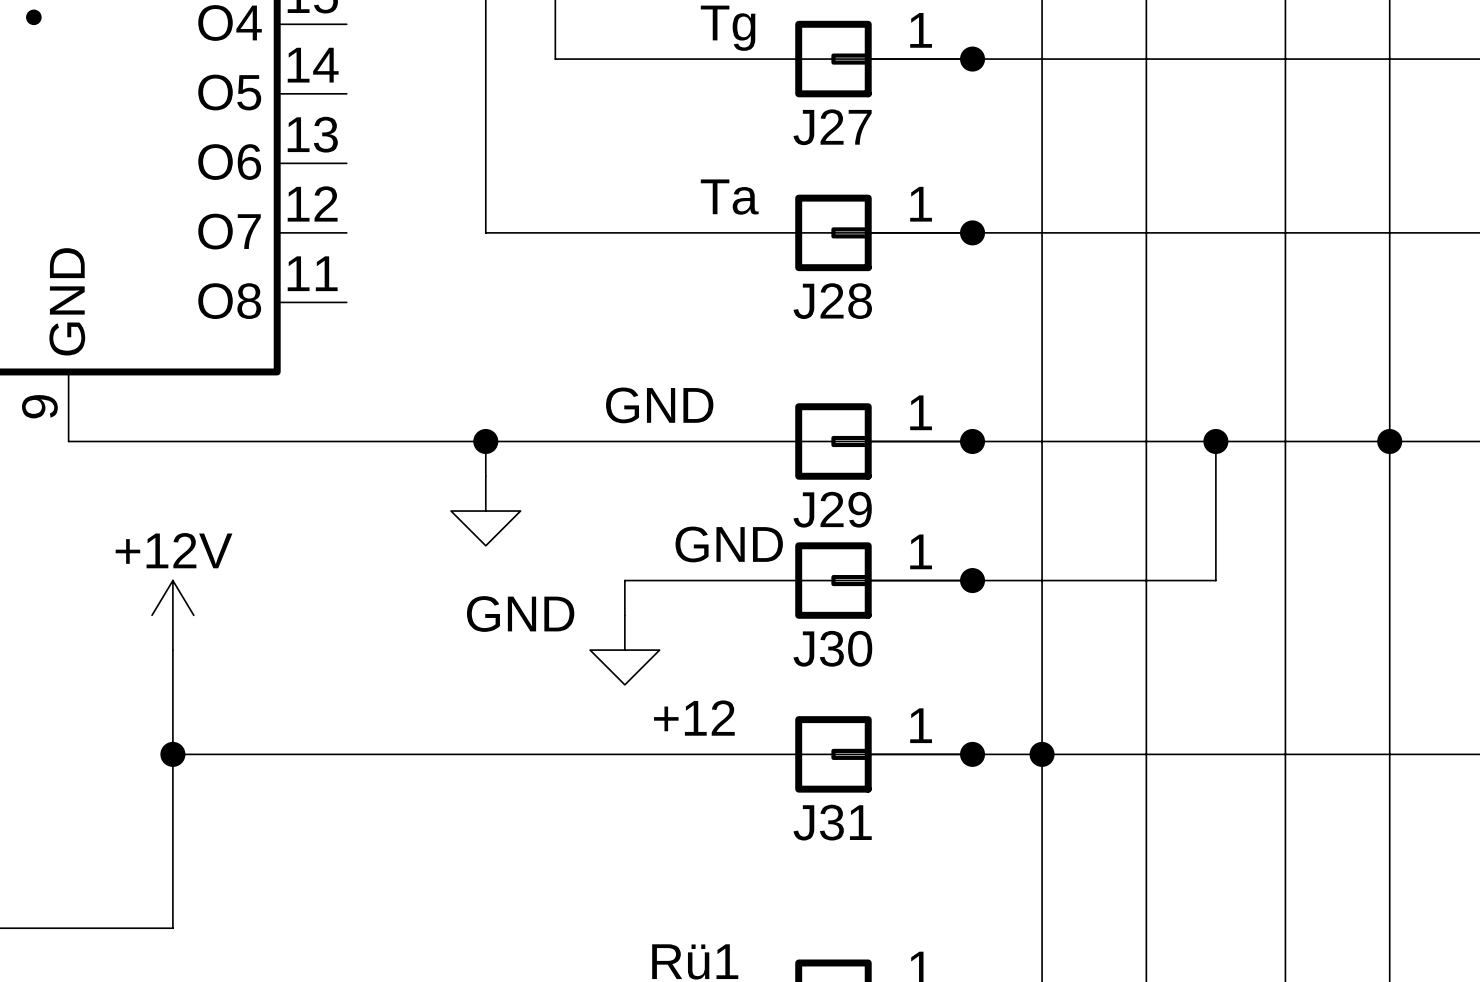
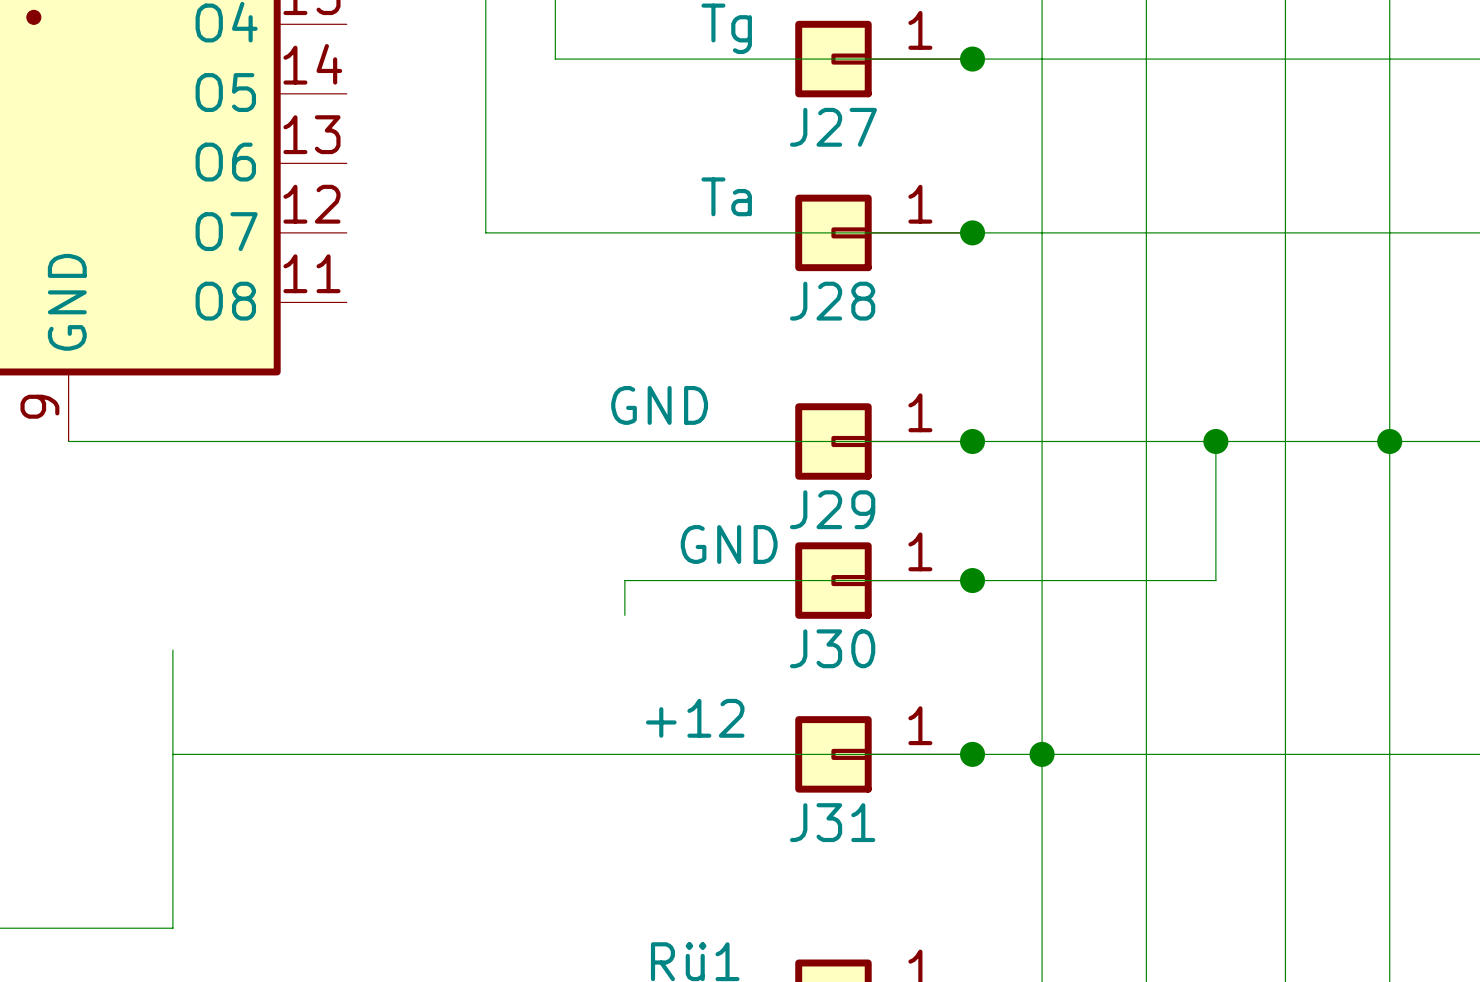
wire: (485, 441) (485, 476) -> none
junction: (485, 441) -> none
power symbol: (485, 511) -> none
power symbol: +12V (172, 615) -> none
power symbol: GND (624, 650) -> none
junction: (172, 754) -> none

